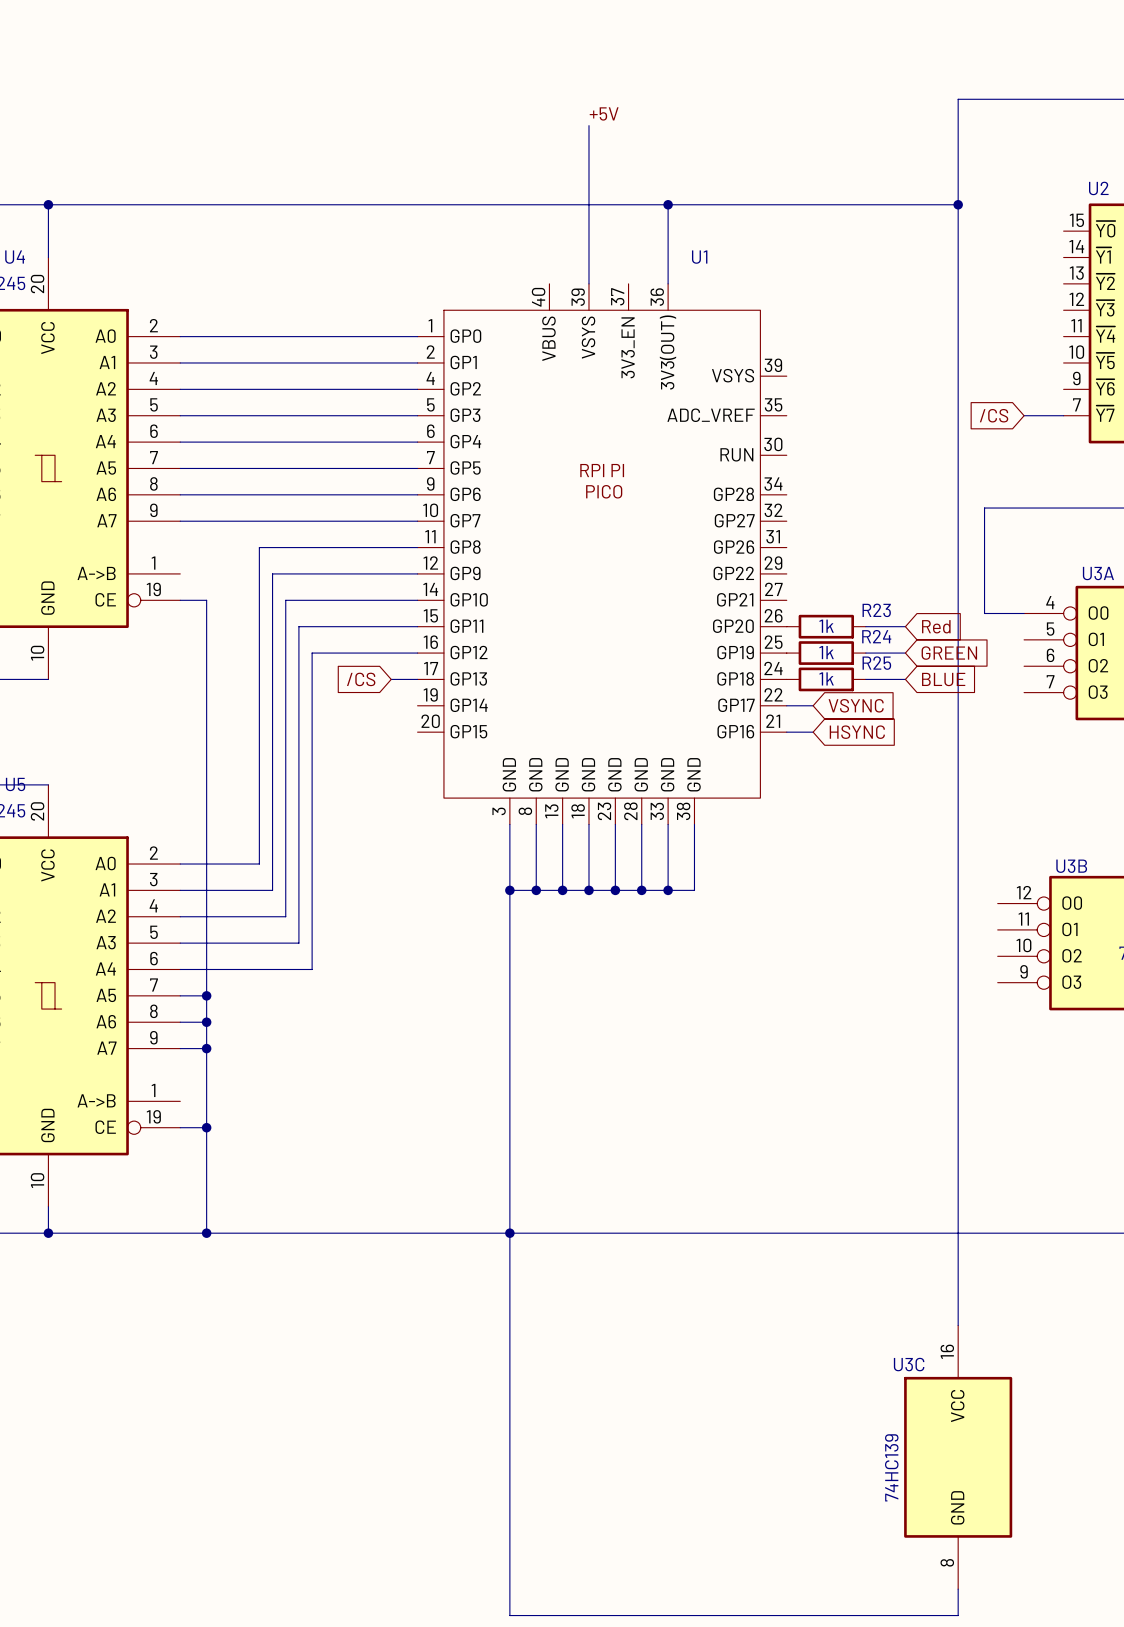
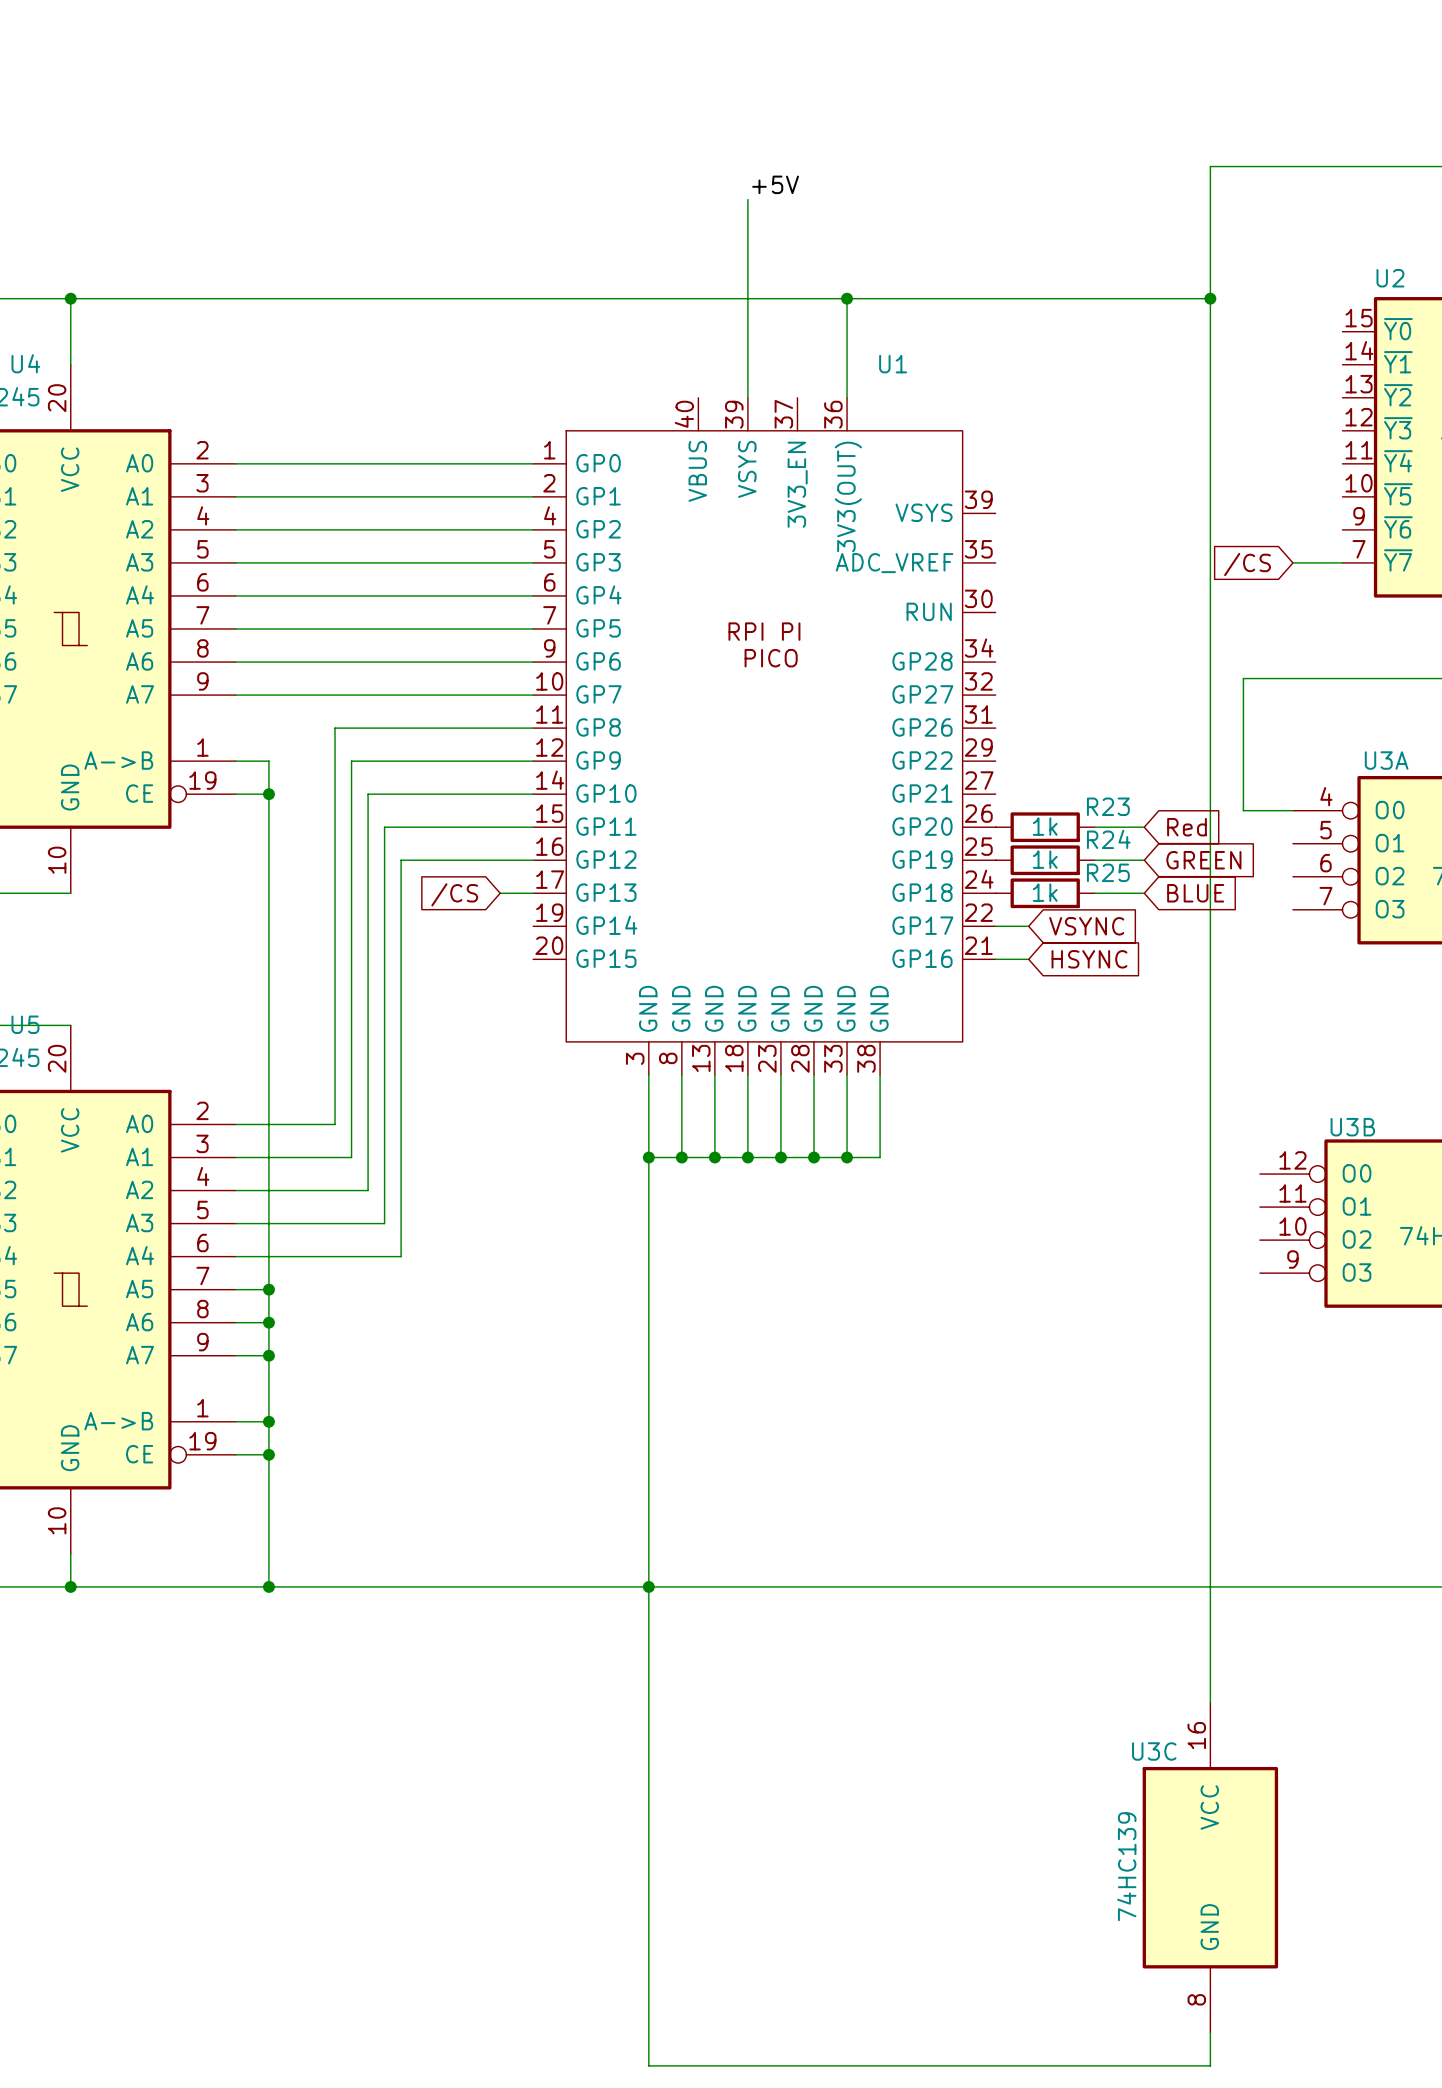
wire: none -> (235, 761) (268, 761) (268, 794)
junction: none -> (268, 794)
wire: none -> (235, 1421) (268, 1421)
junction: none -> (268, 1421)

